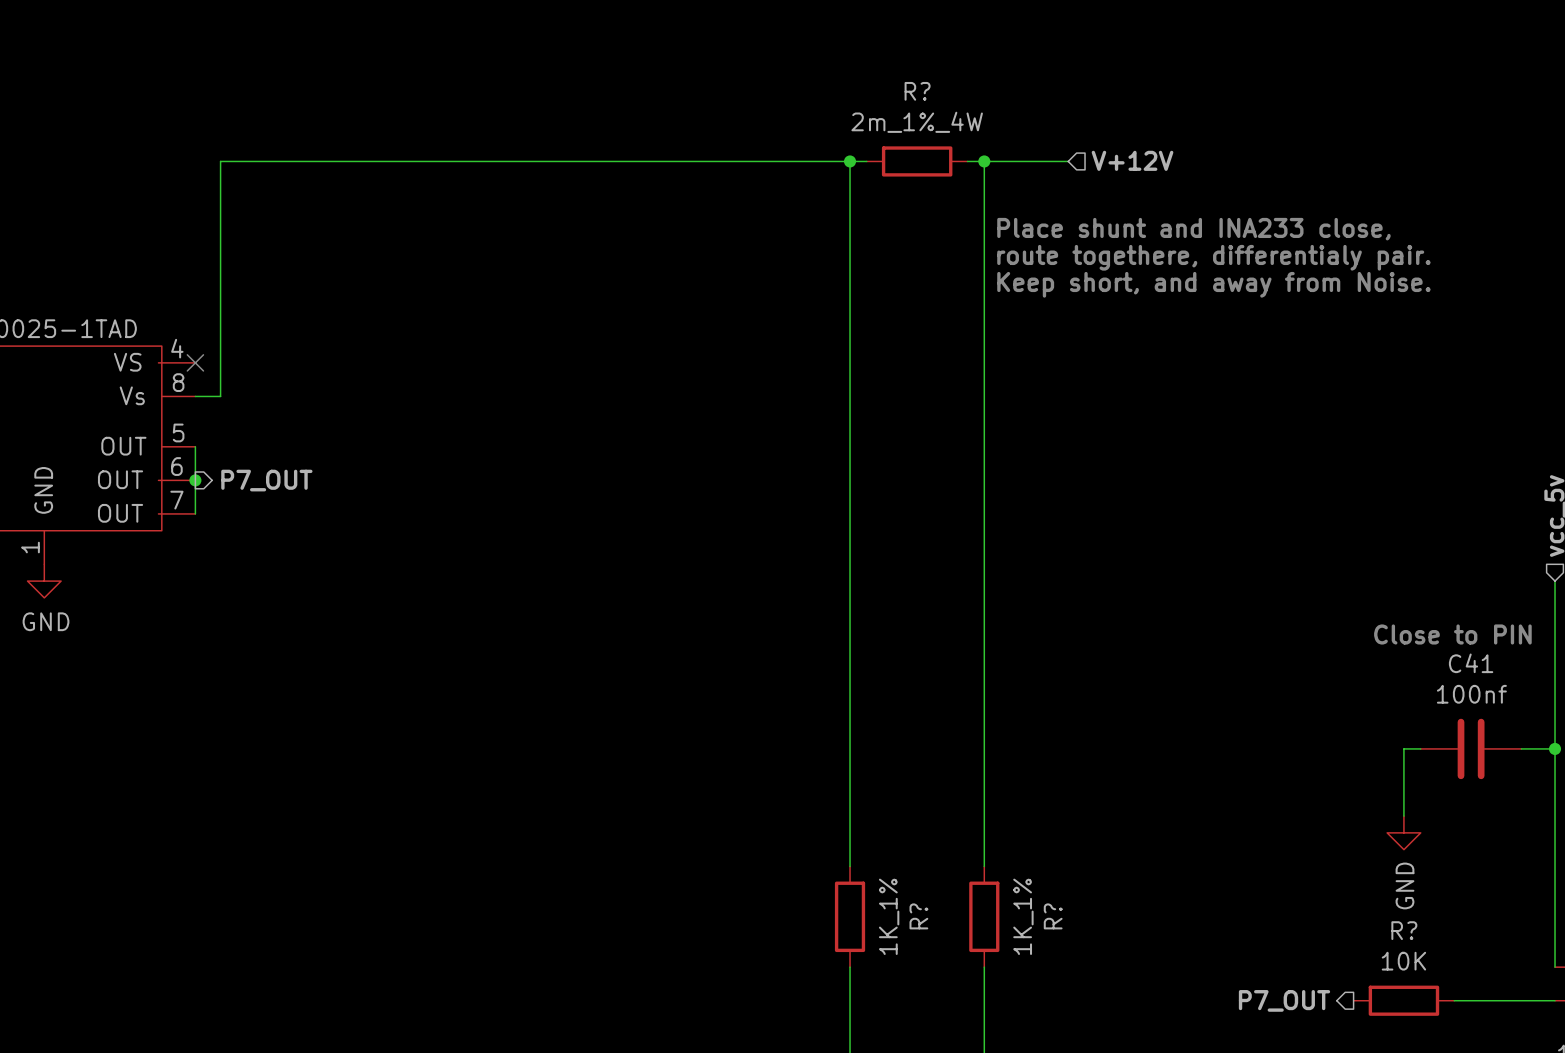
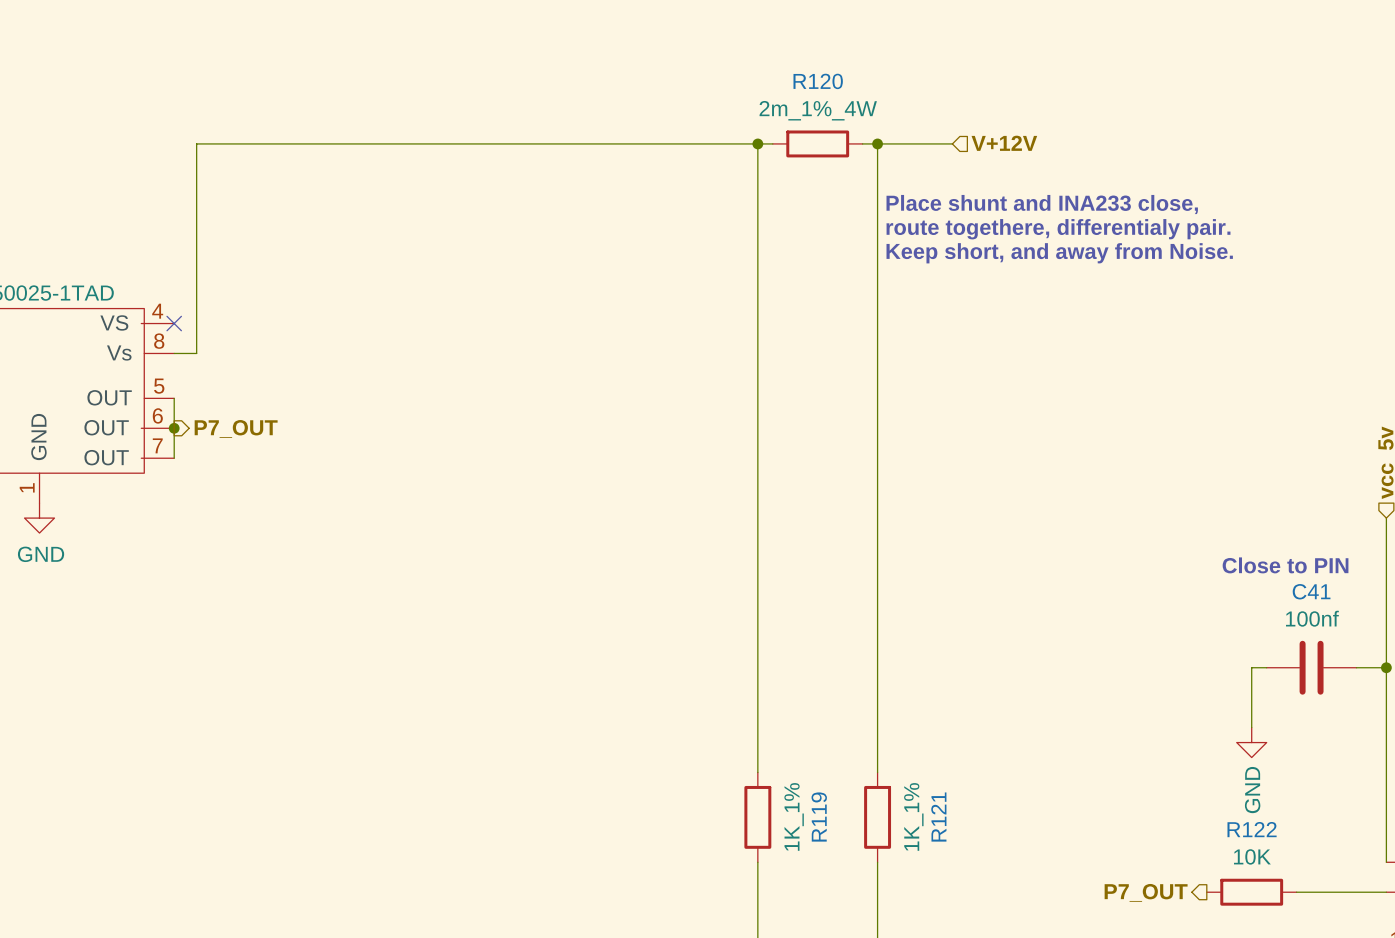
R? name: R? (917, 91) -> R120 (818, 81)
R? name: R? (918, 916) -> R119 (819, 817)
R? name: R? (1053, 916) -> R121 (938, 817)
R? name: R? (1404, 930) -> R122 (1252, 829)

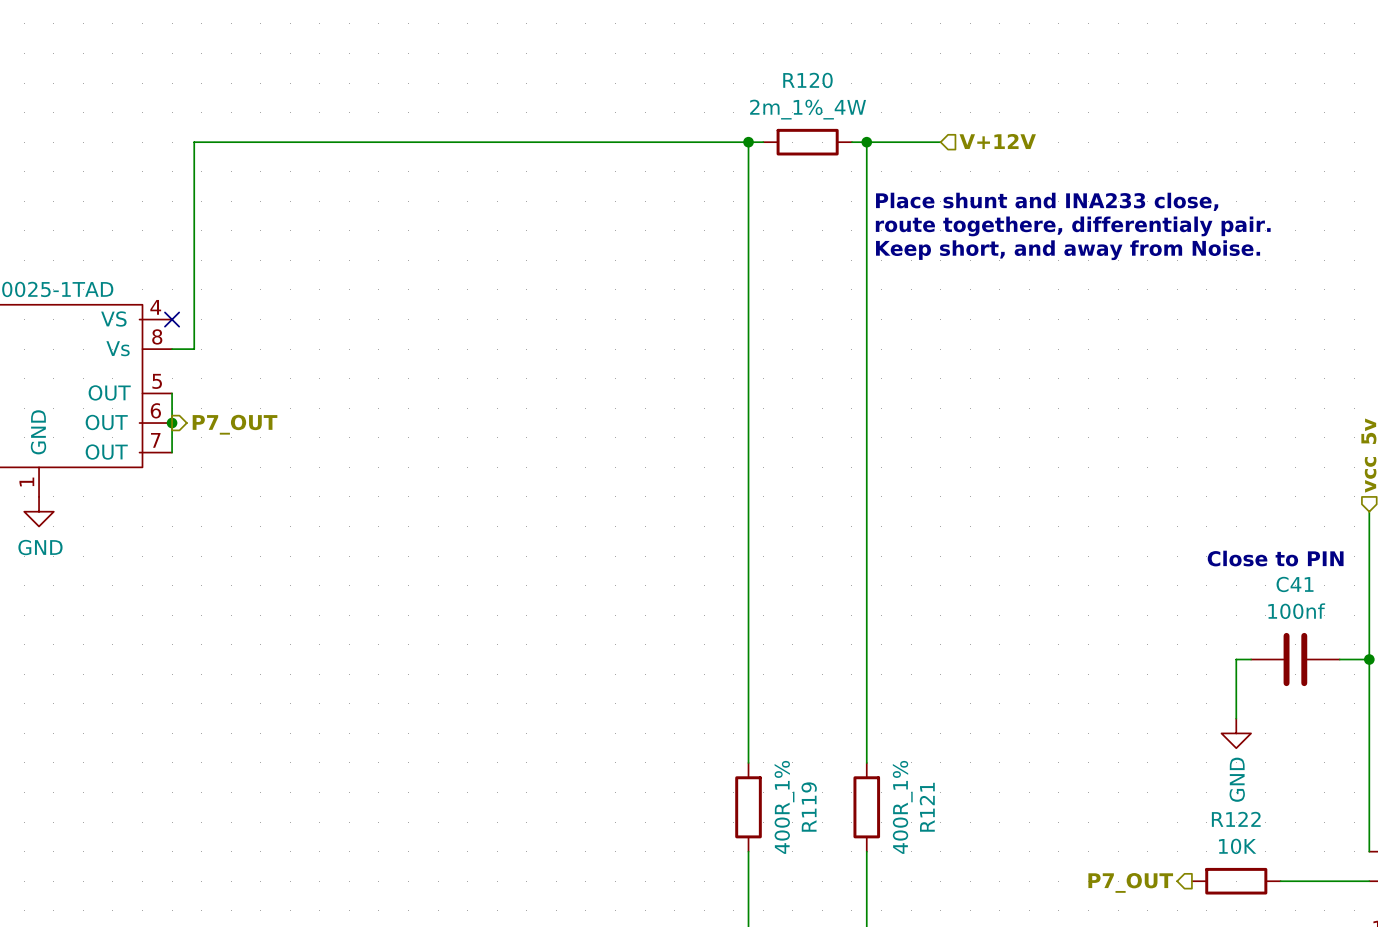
R119 value: 1K_1% (794, 816) -> 400R_1% (784, 807)
R121 value: 1K_1% (913, 816) -> 400R_1% (902, 807)

